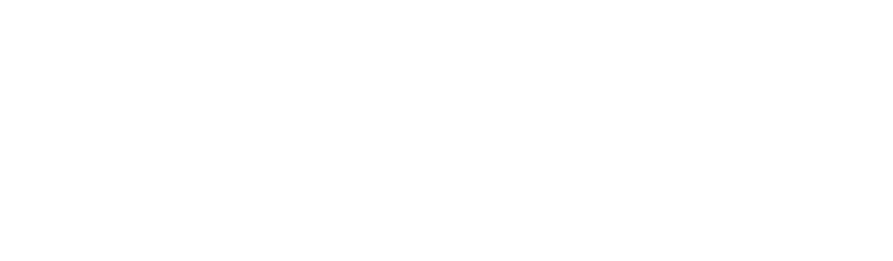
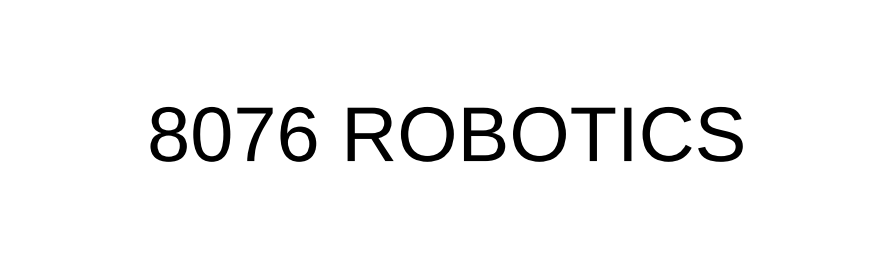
text: none -> 8076 ROBOTICS (446, 134)

